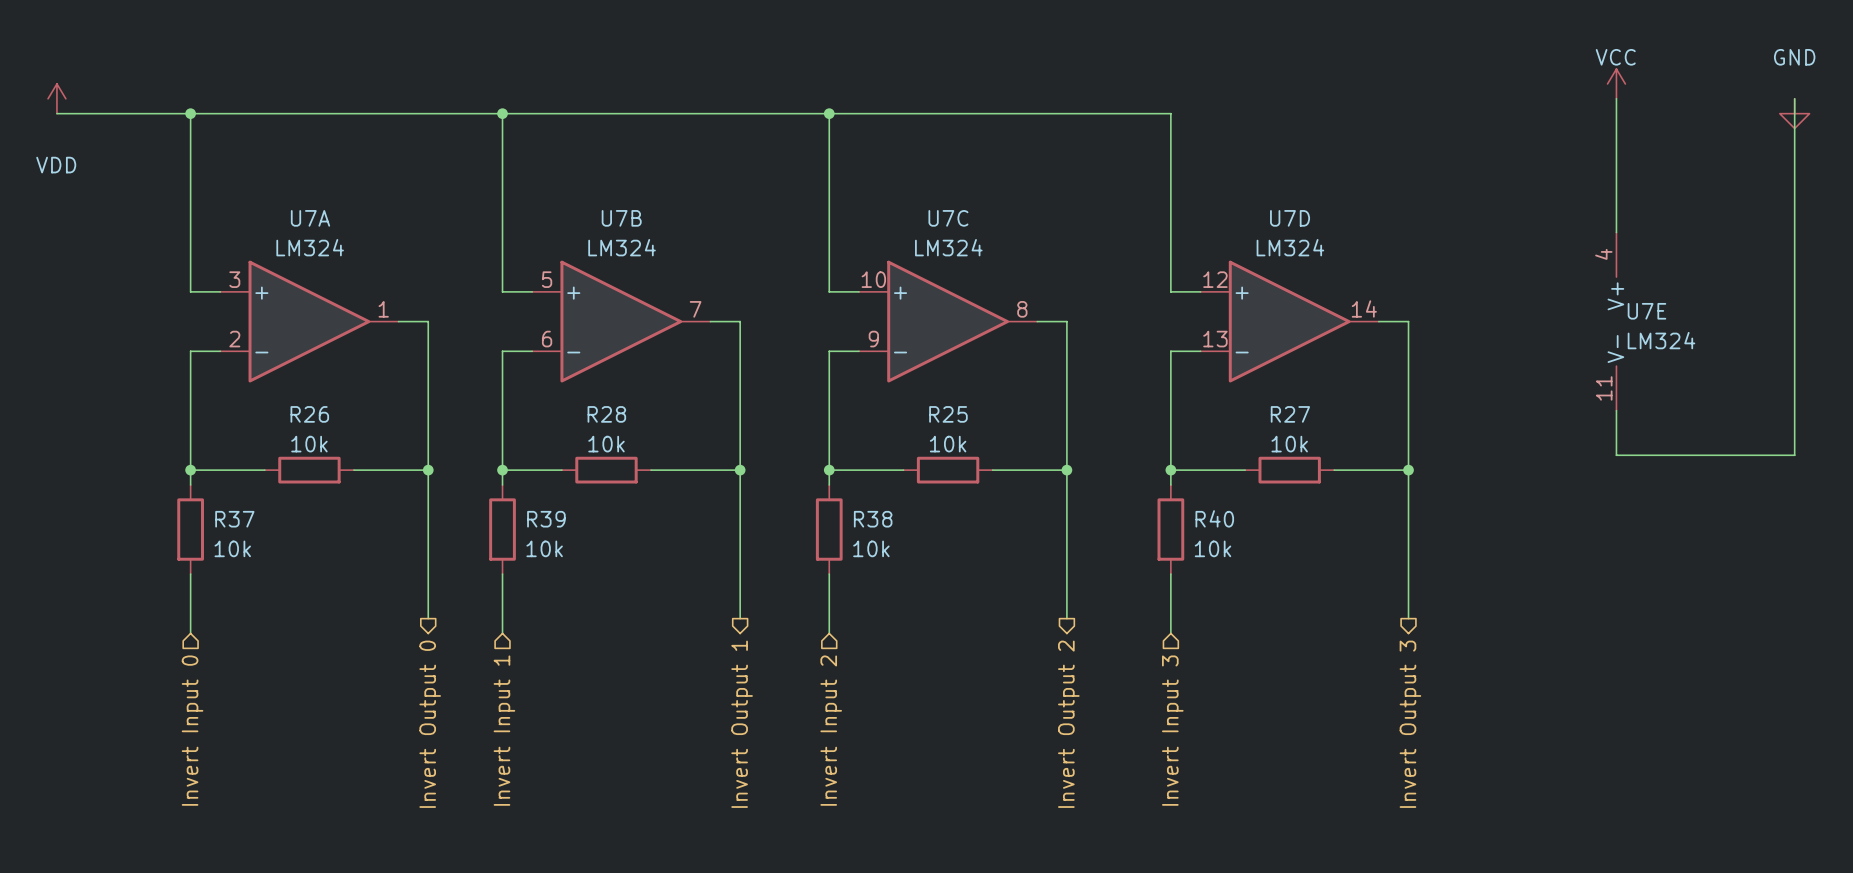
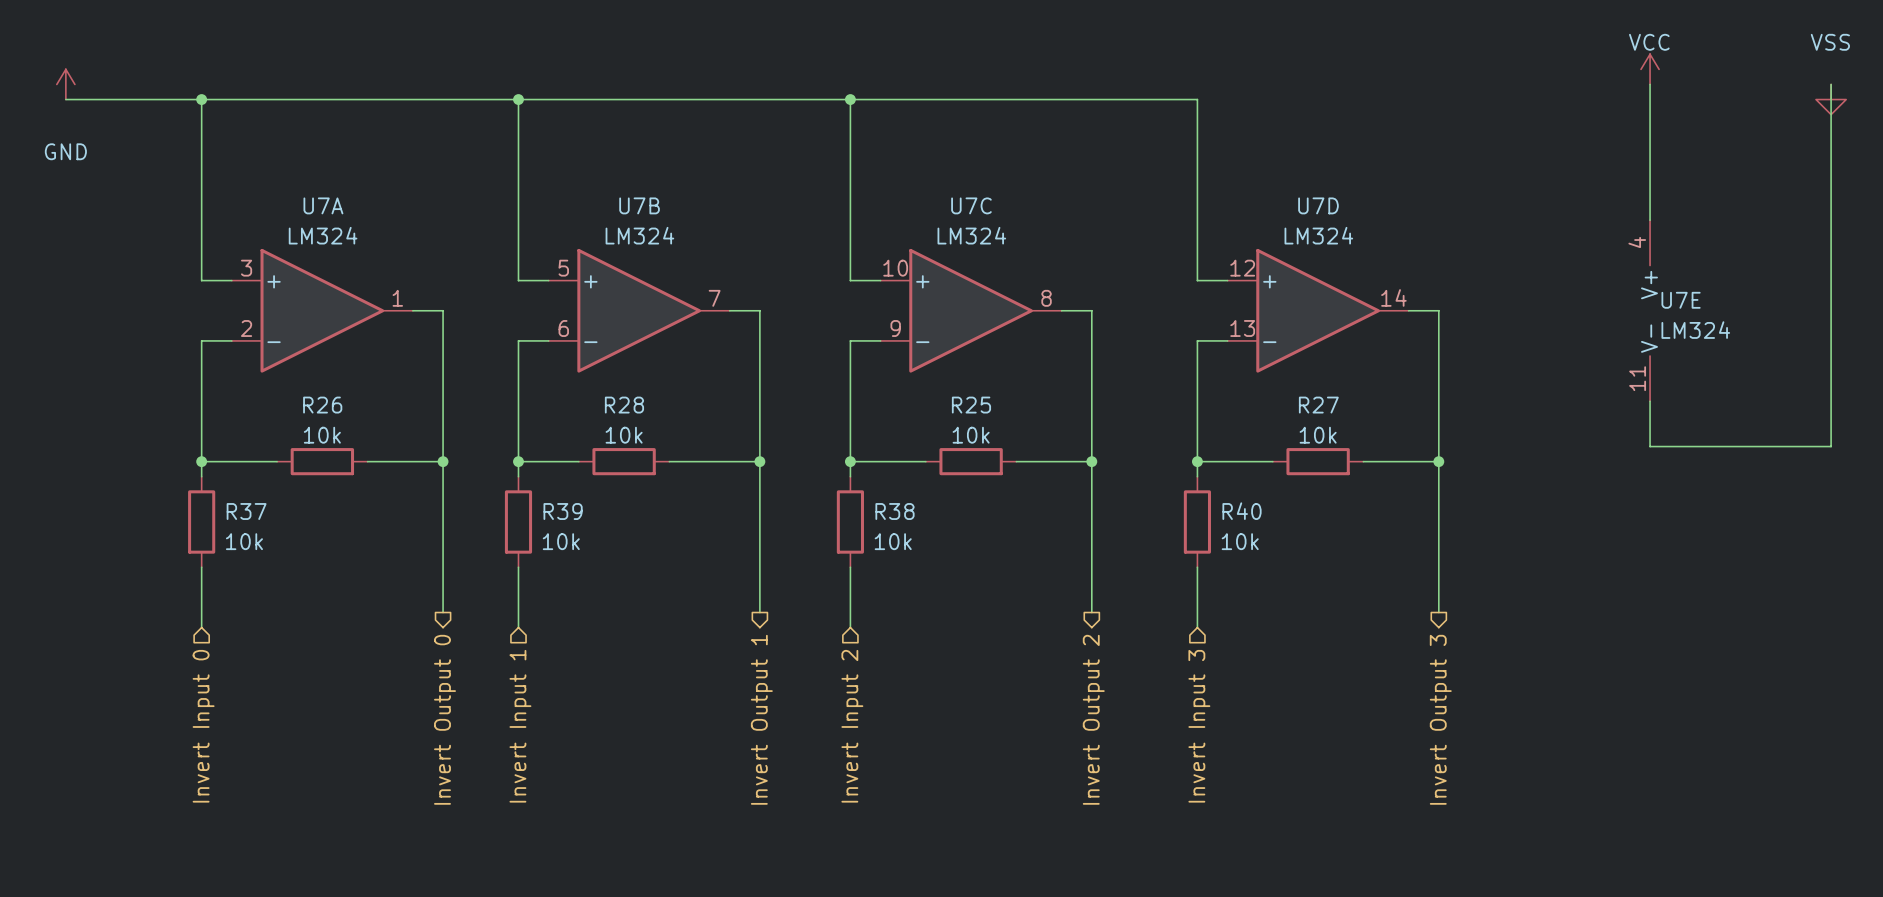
power symbol: VDD (56, 98) -> GND (65, 84)
power symbol: GND (1794, 113) -> VSS (1831, 99)

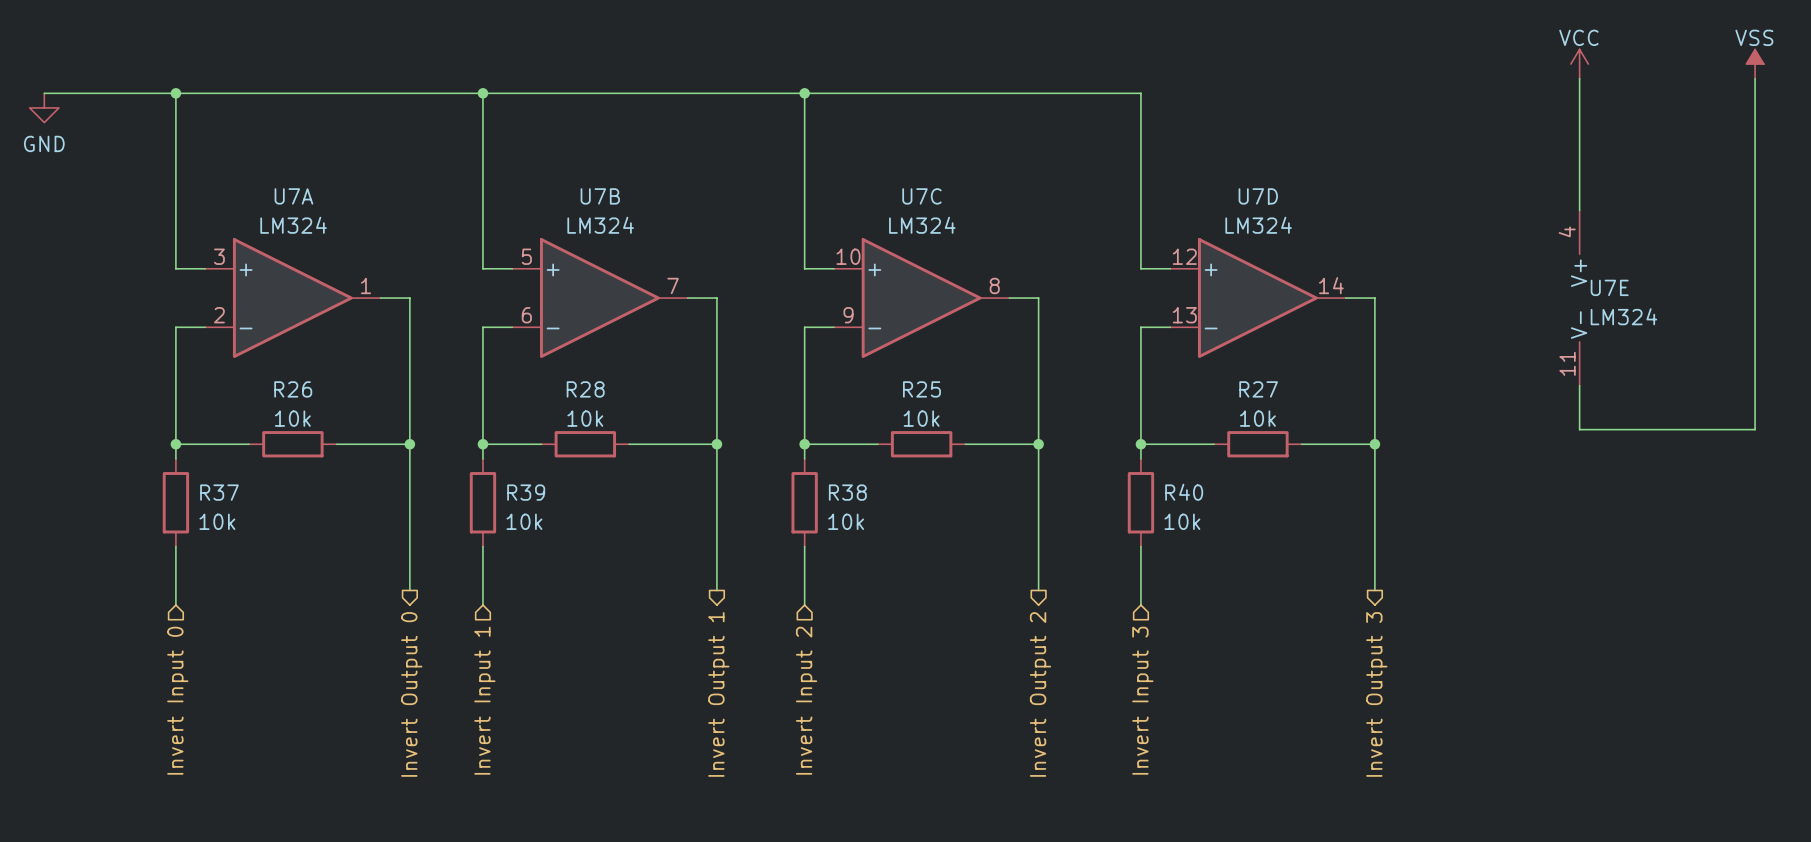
power symbol: none -> VSS (1755, 64)
power symbol: GND (65, 84) -> none
power symbol: VSS (1831, 99) -> none
power symbol: none -> GND (44, 107)

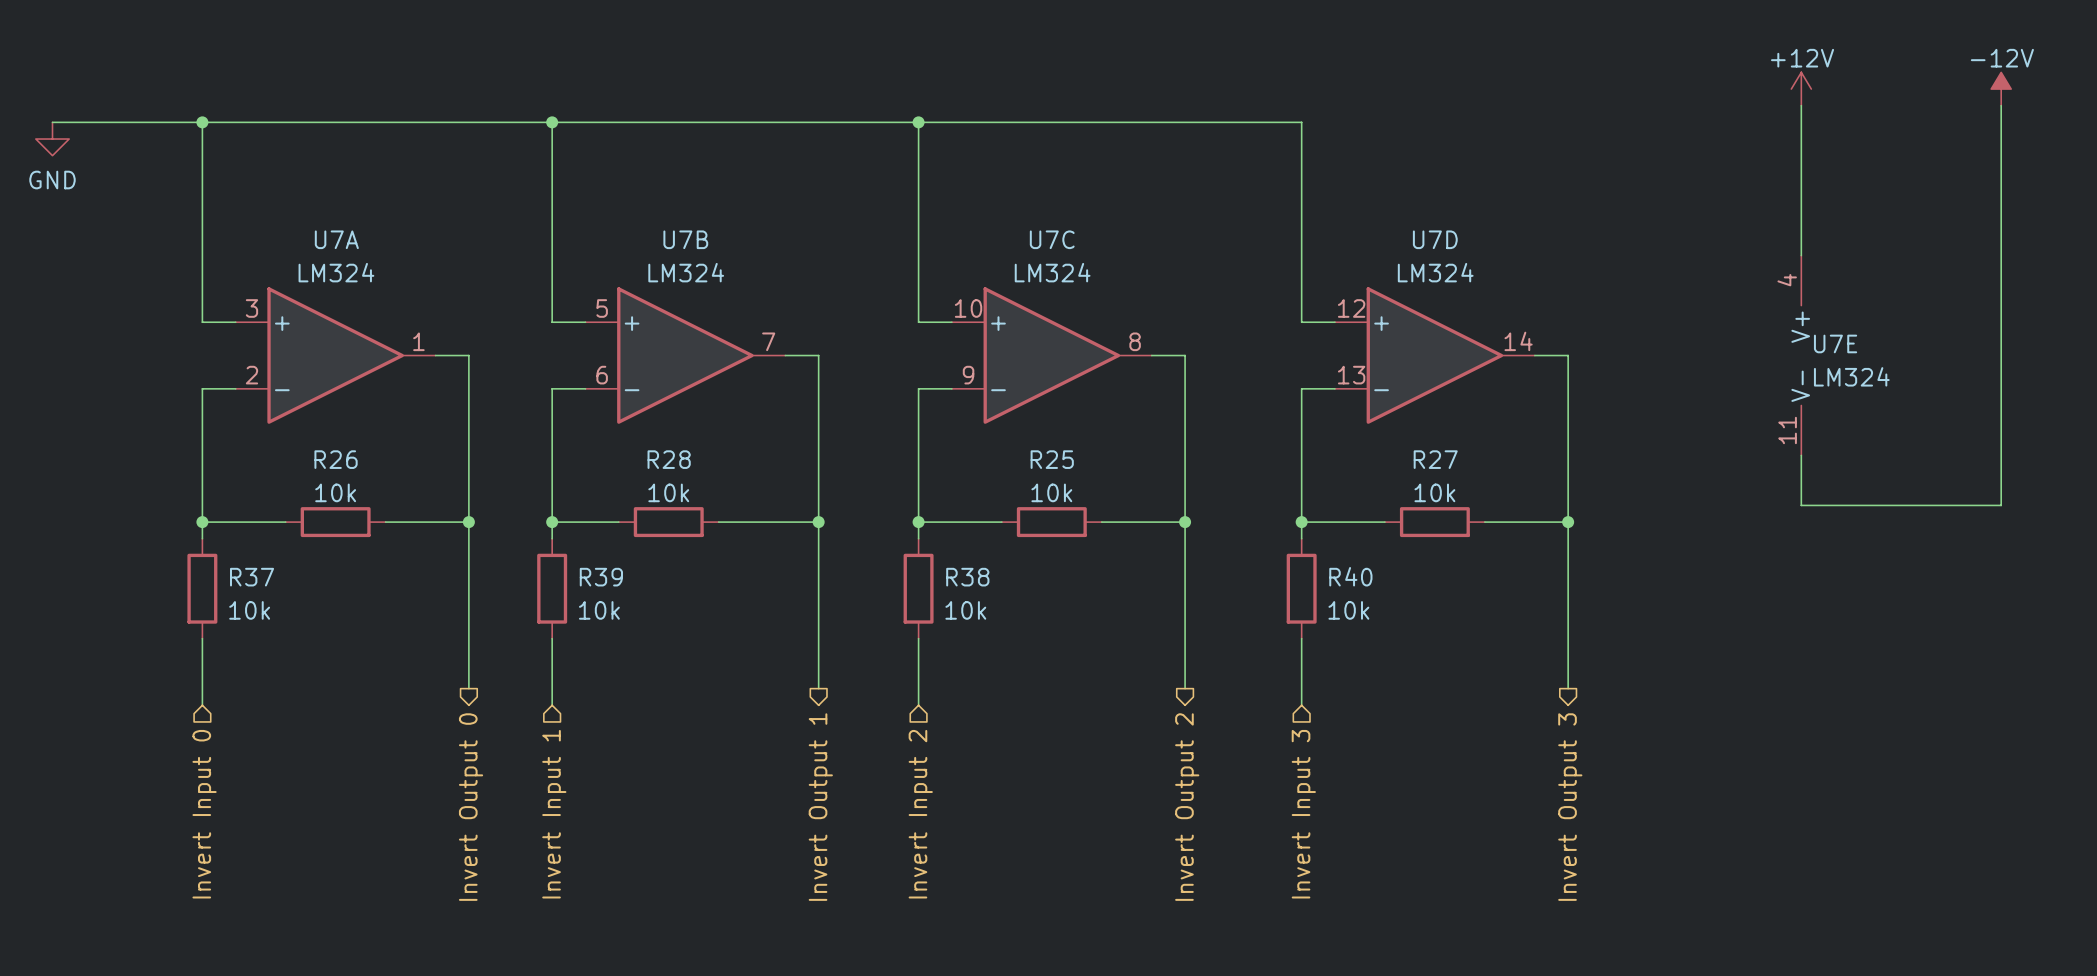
power symbol: VCC (1579, 64) -> +12V (1801, 89)
power symbol: VSS (1755, 64) -> -12V (2001, 89)

